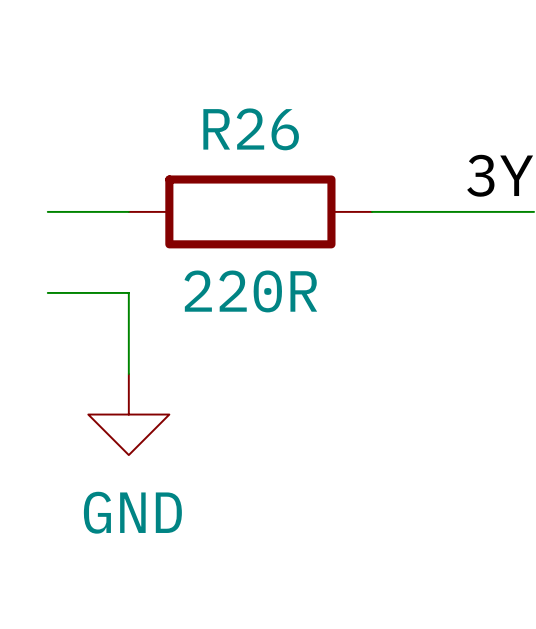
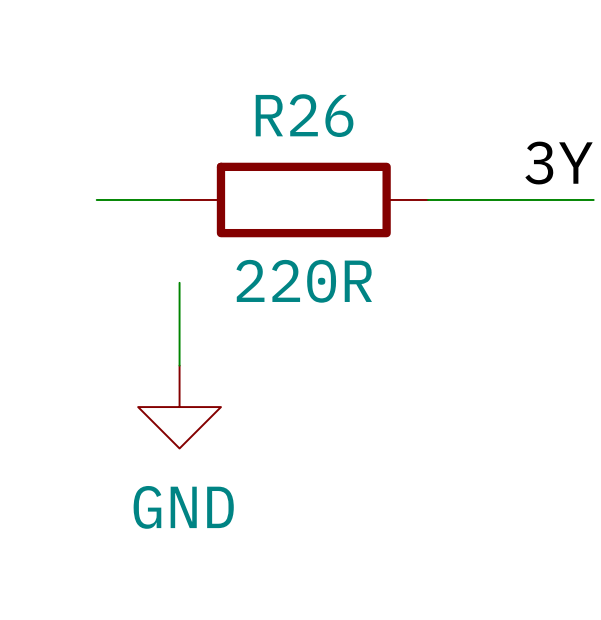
wire: (47, 292) (128, 292) -> none

